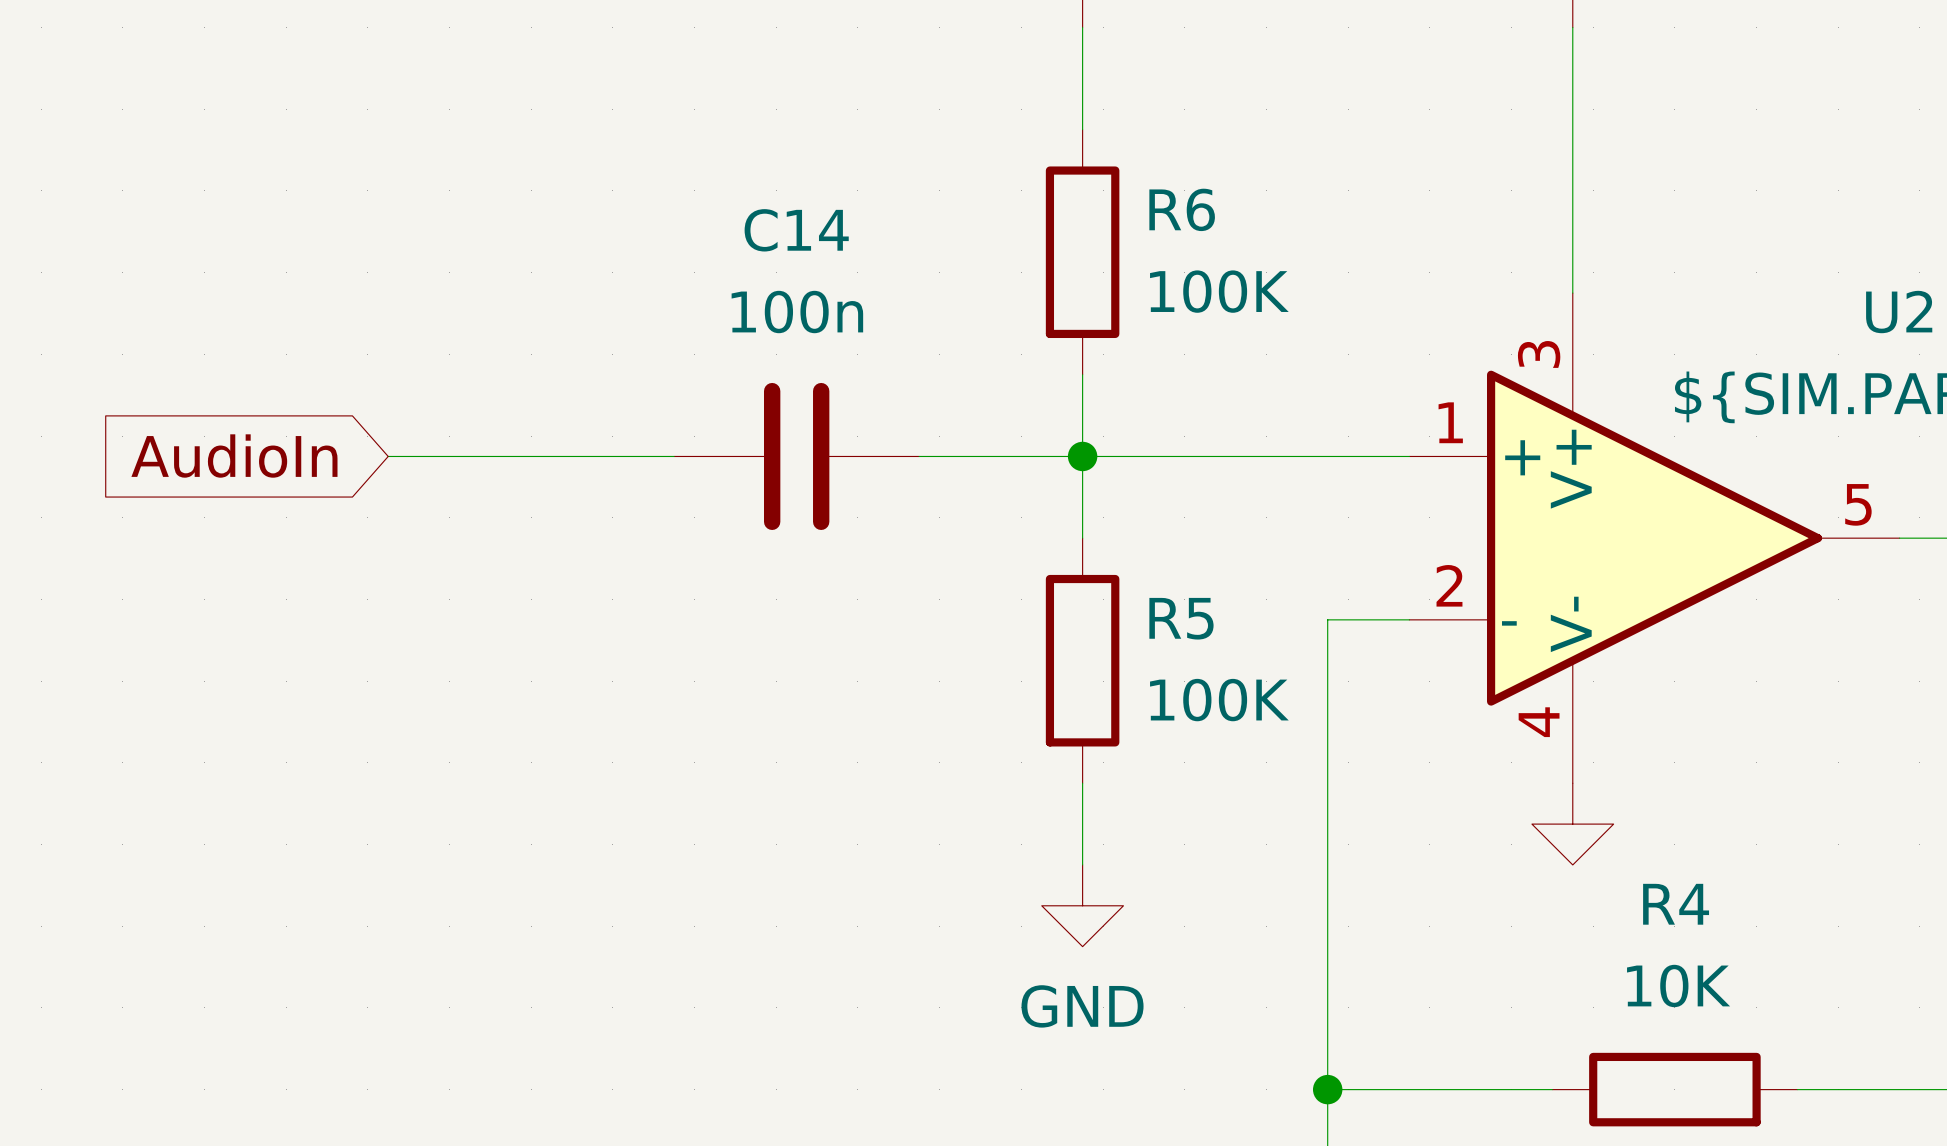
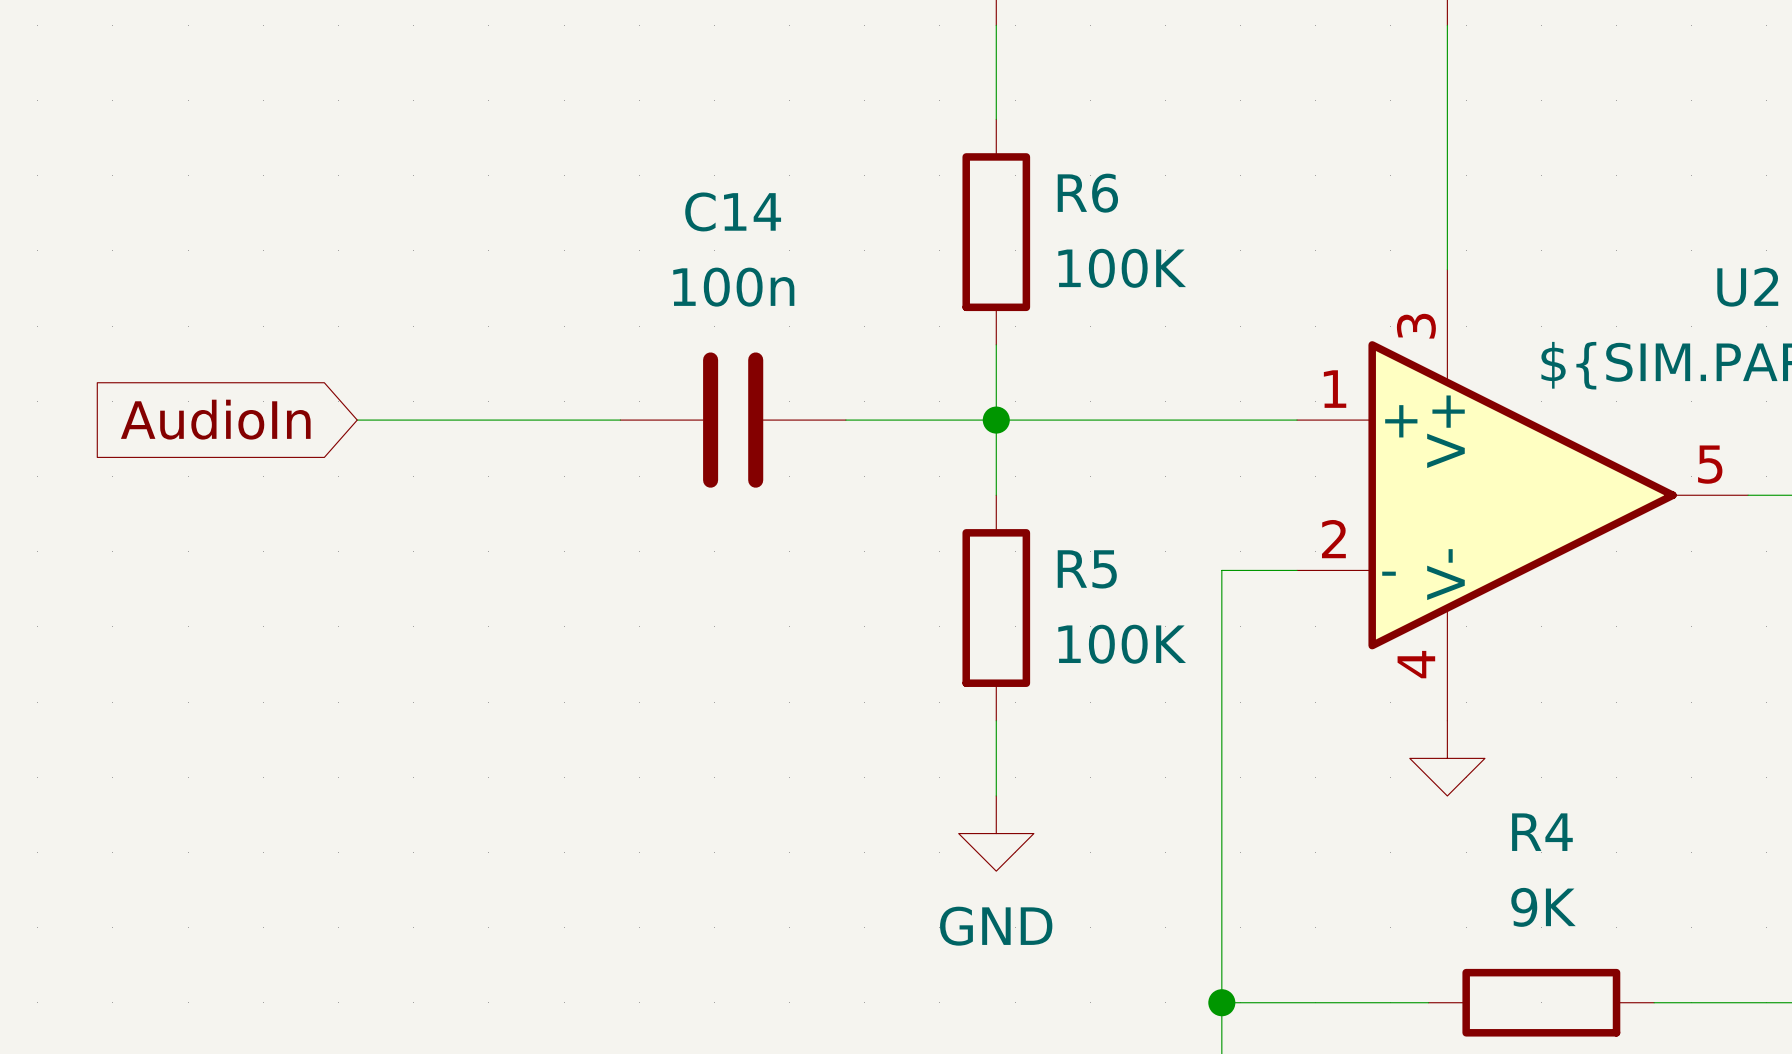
R4 value: 10K (1678, 985) -> 9K (1543, 907)

